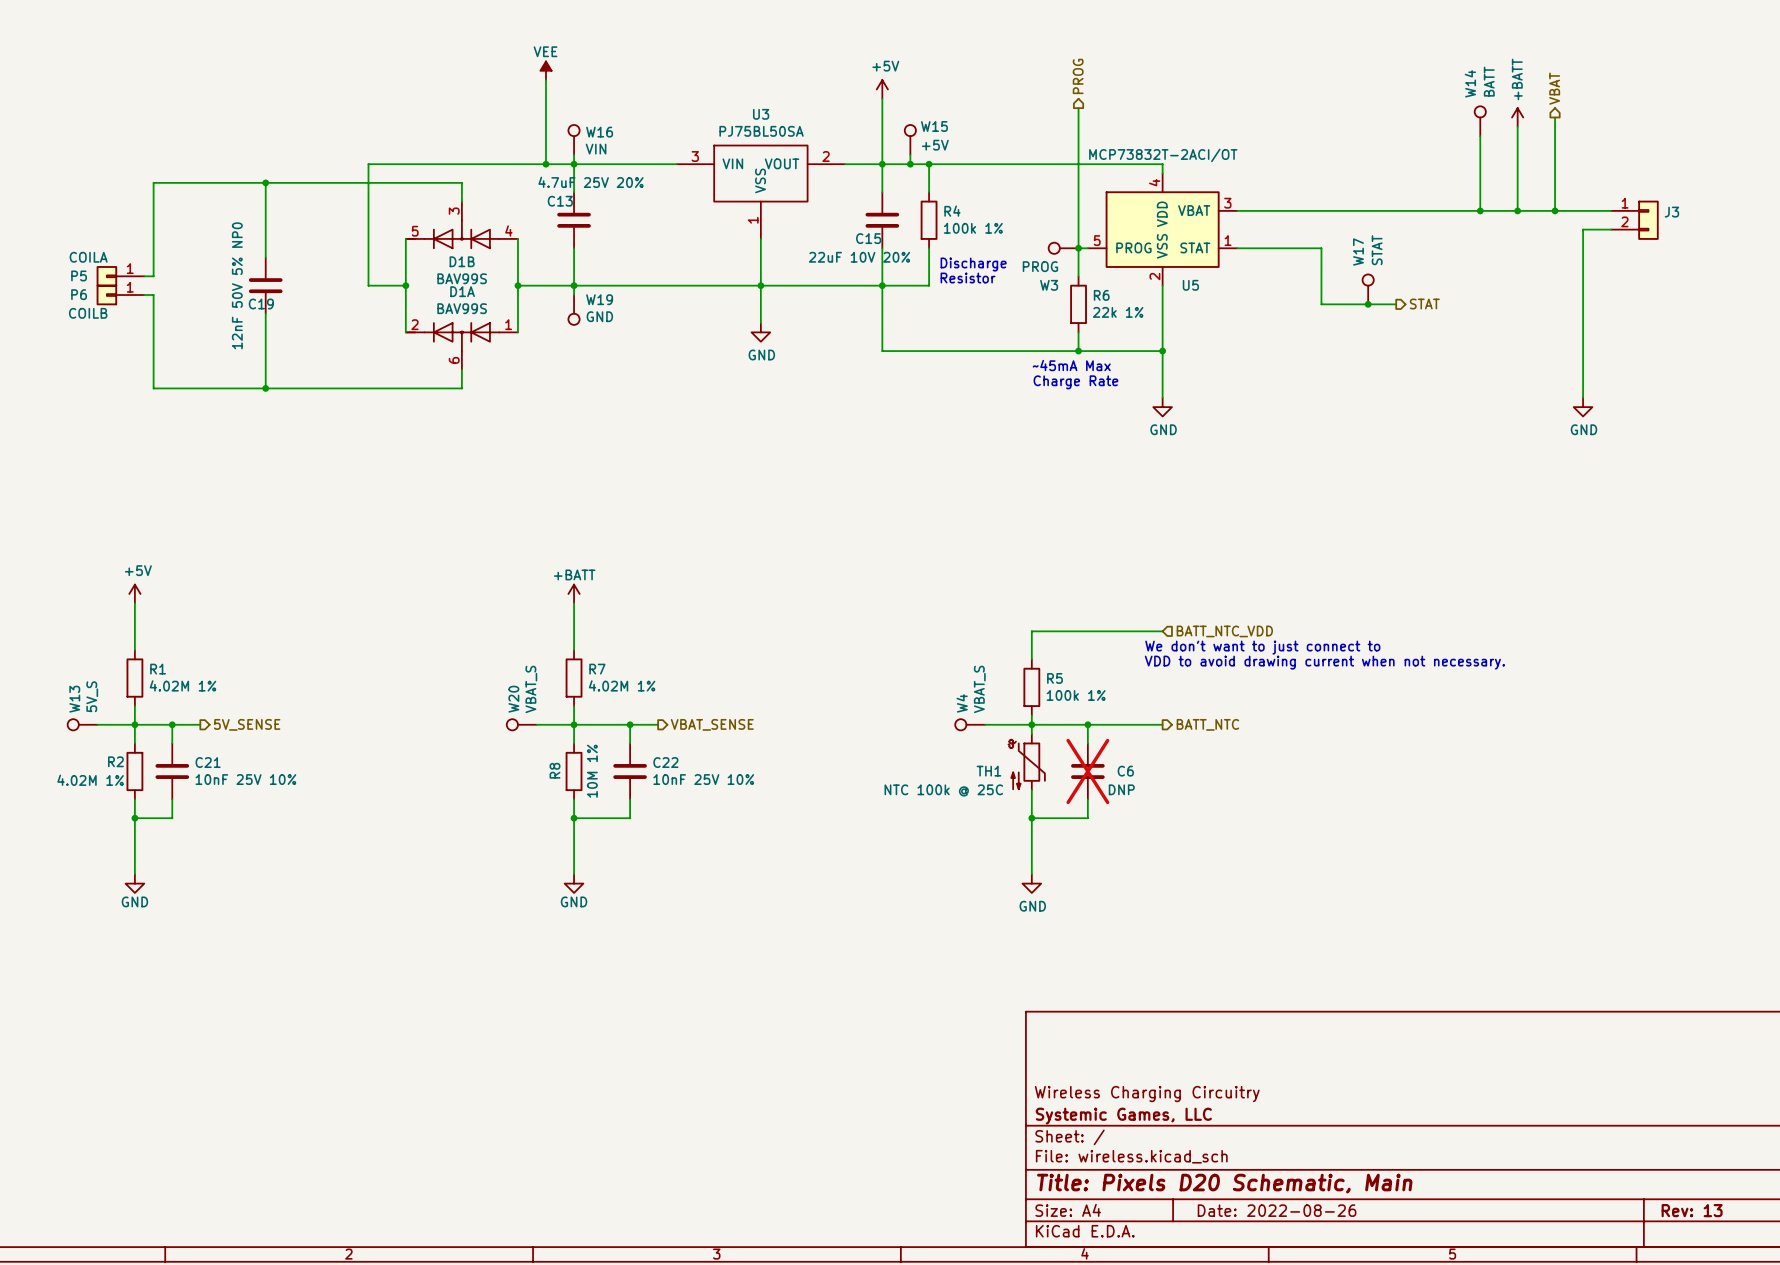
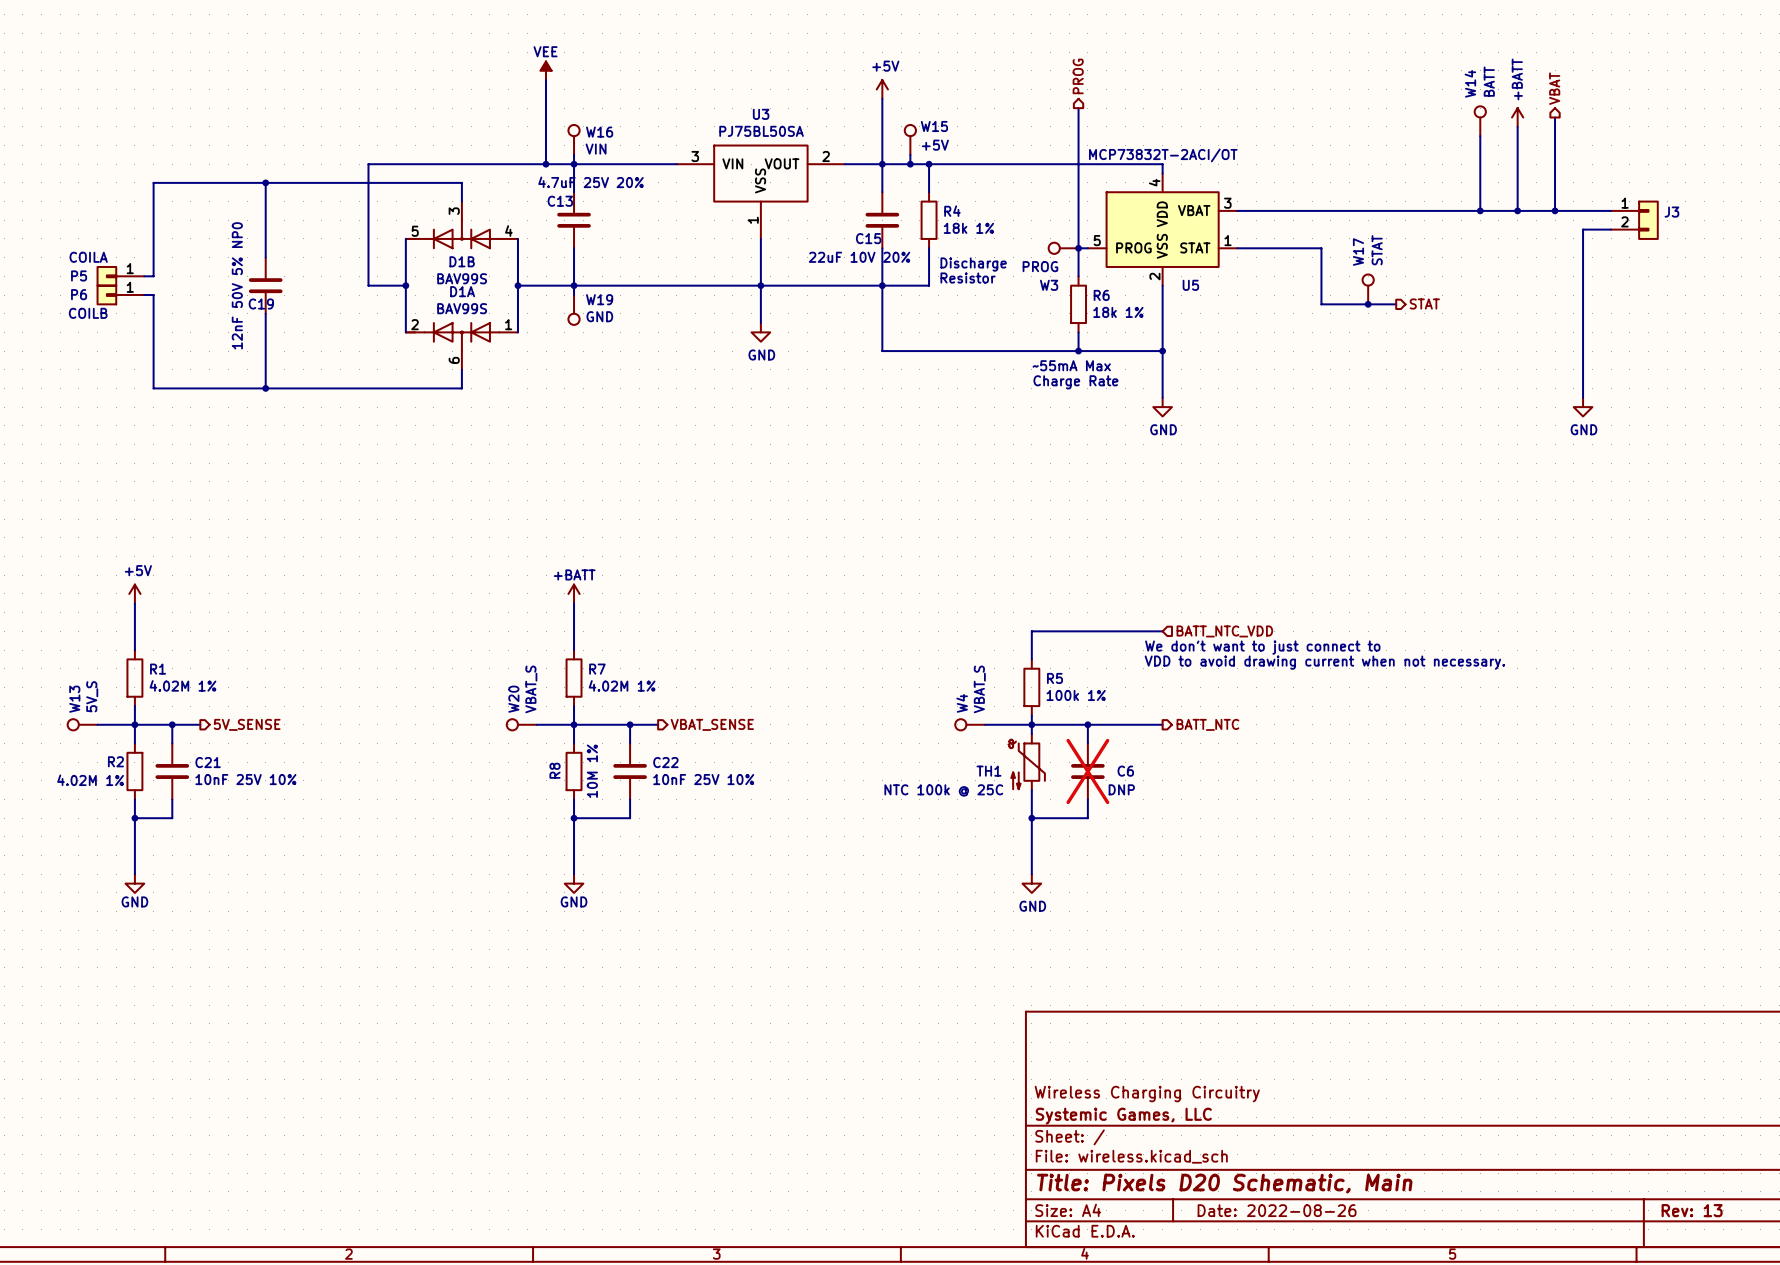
R4 value: 100k 1% (973, 228) -> 18k 1% (968, 228)
R6 value: 22k 1% (1118, 312) -> 18k 1% (1118, 312)
text: ~45mA Max (1071, 365) -> ~55mA Max (1071, 365)

